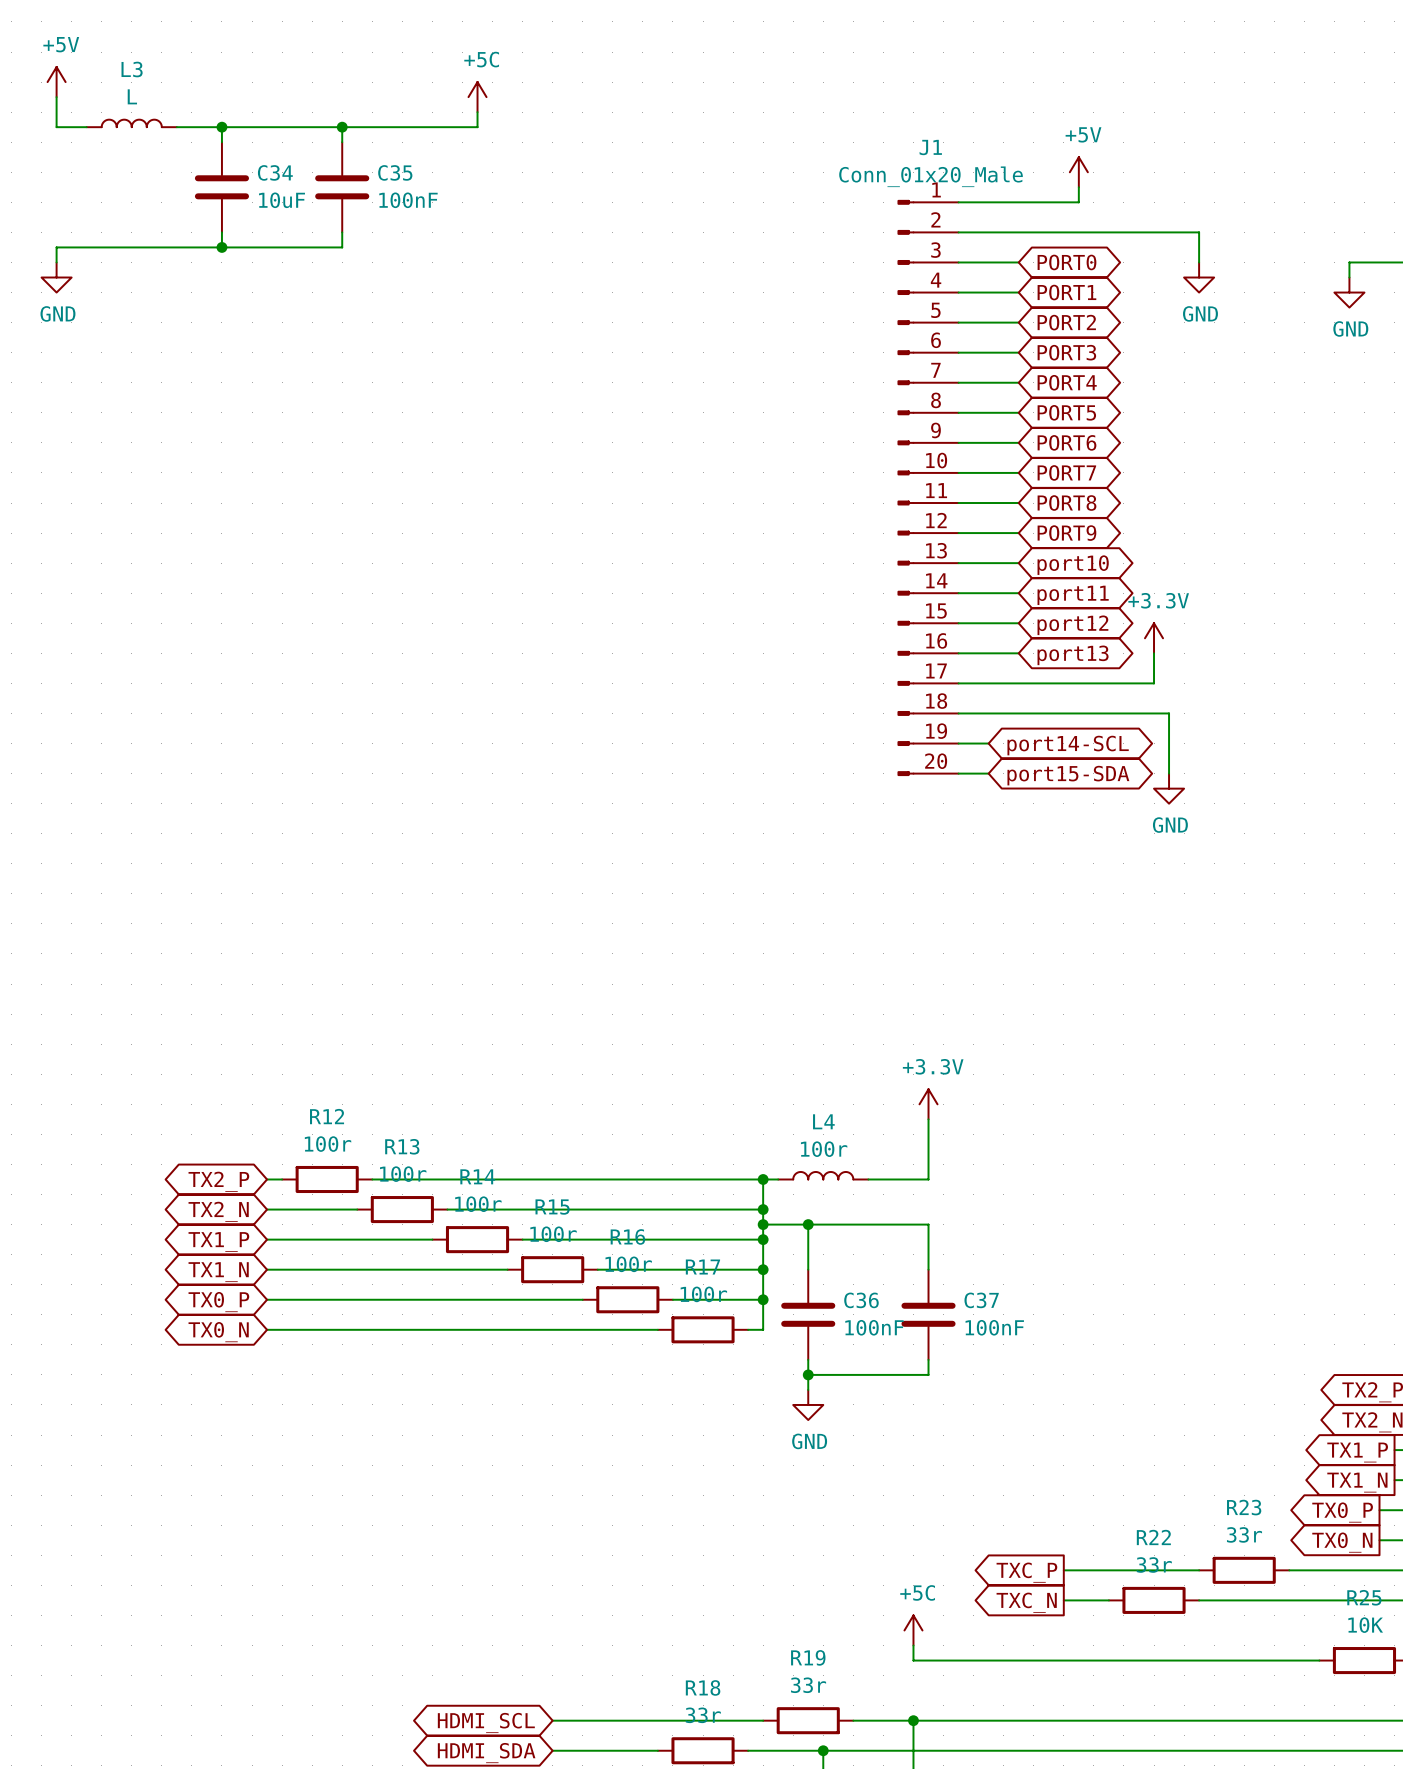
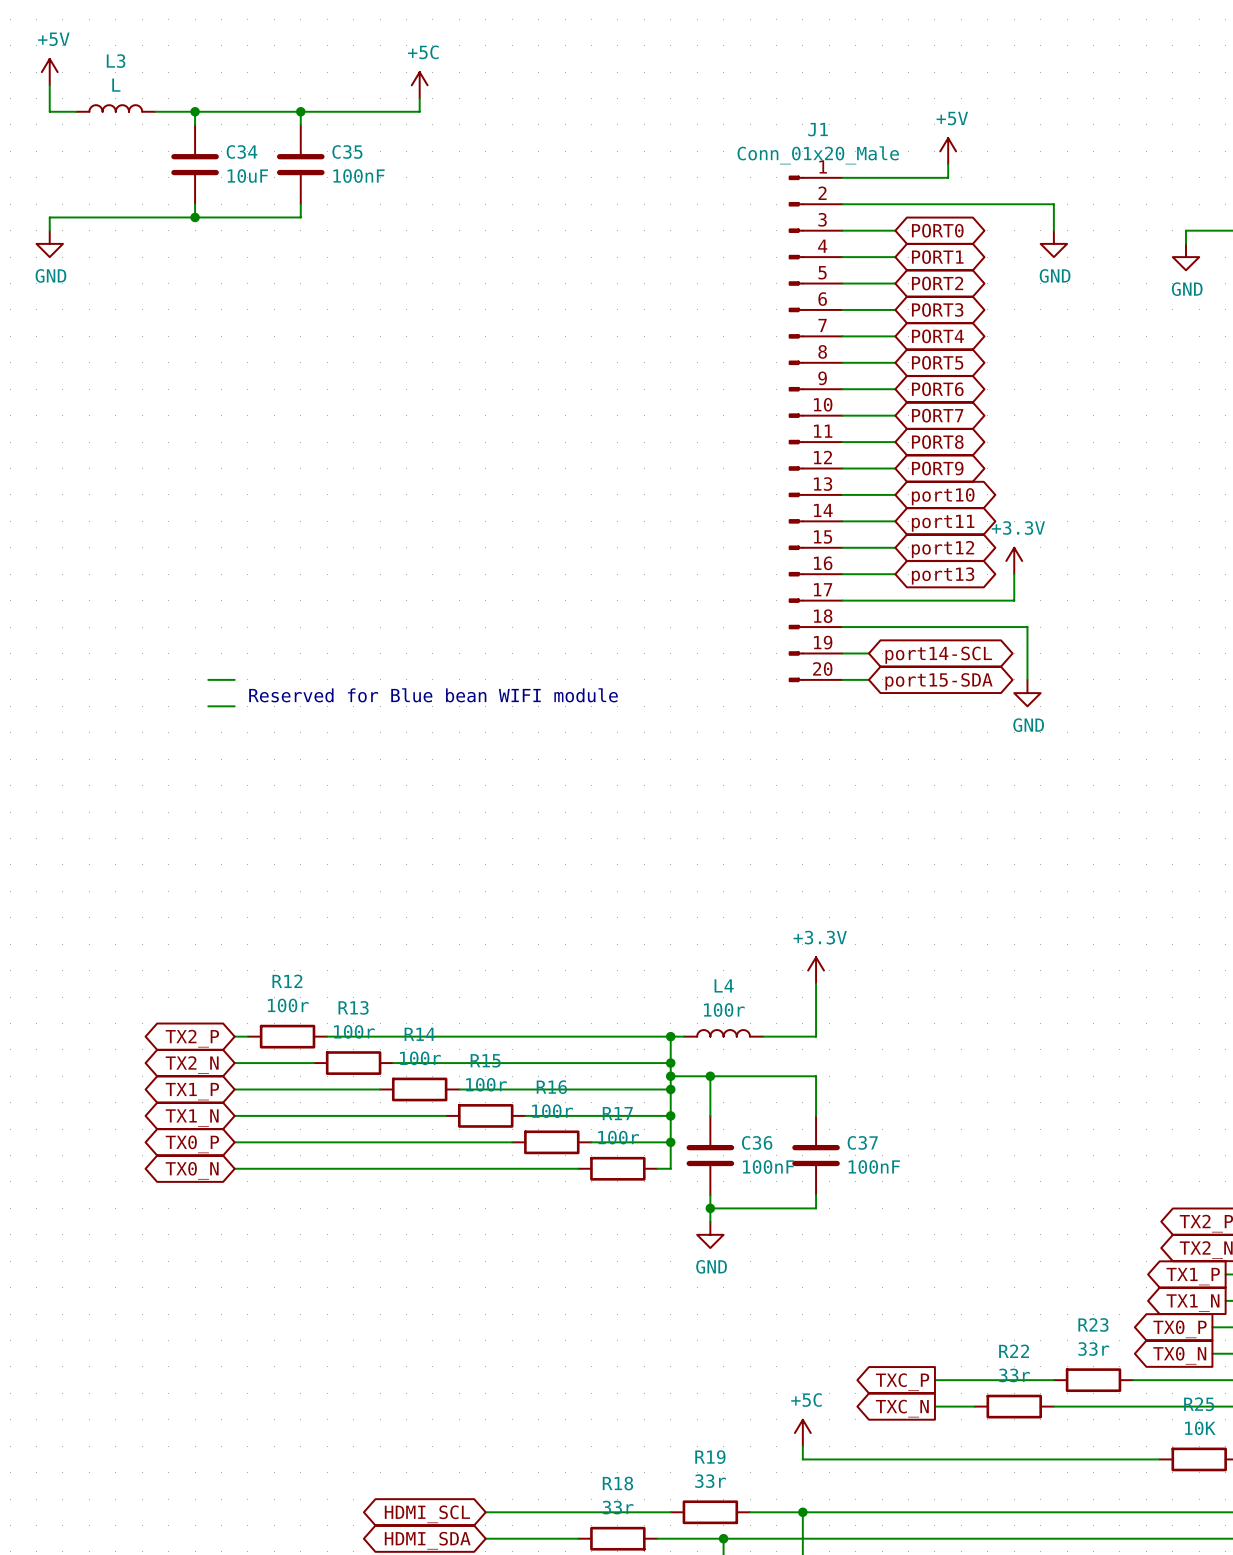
wire: none -> (208, 679) (234, 679)
text: none -> Reserved for Blue bean WIFI module (433, 695)
wire: none -> (208, 706) (234, 706)

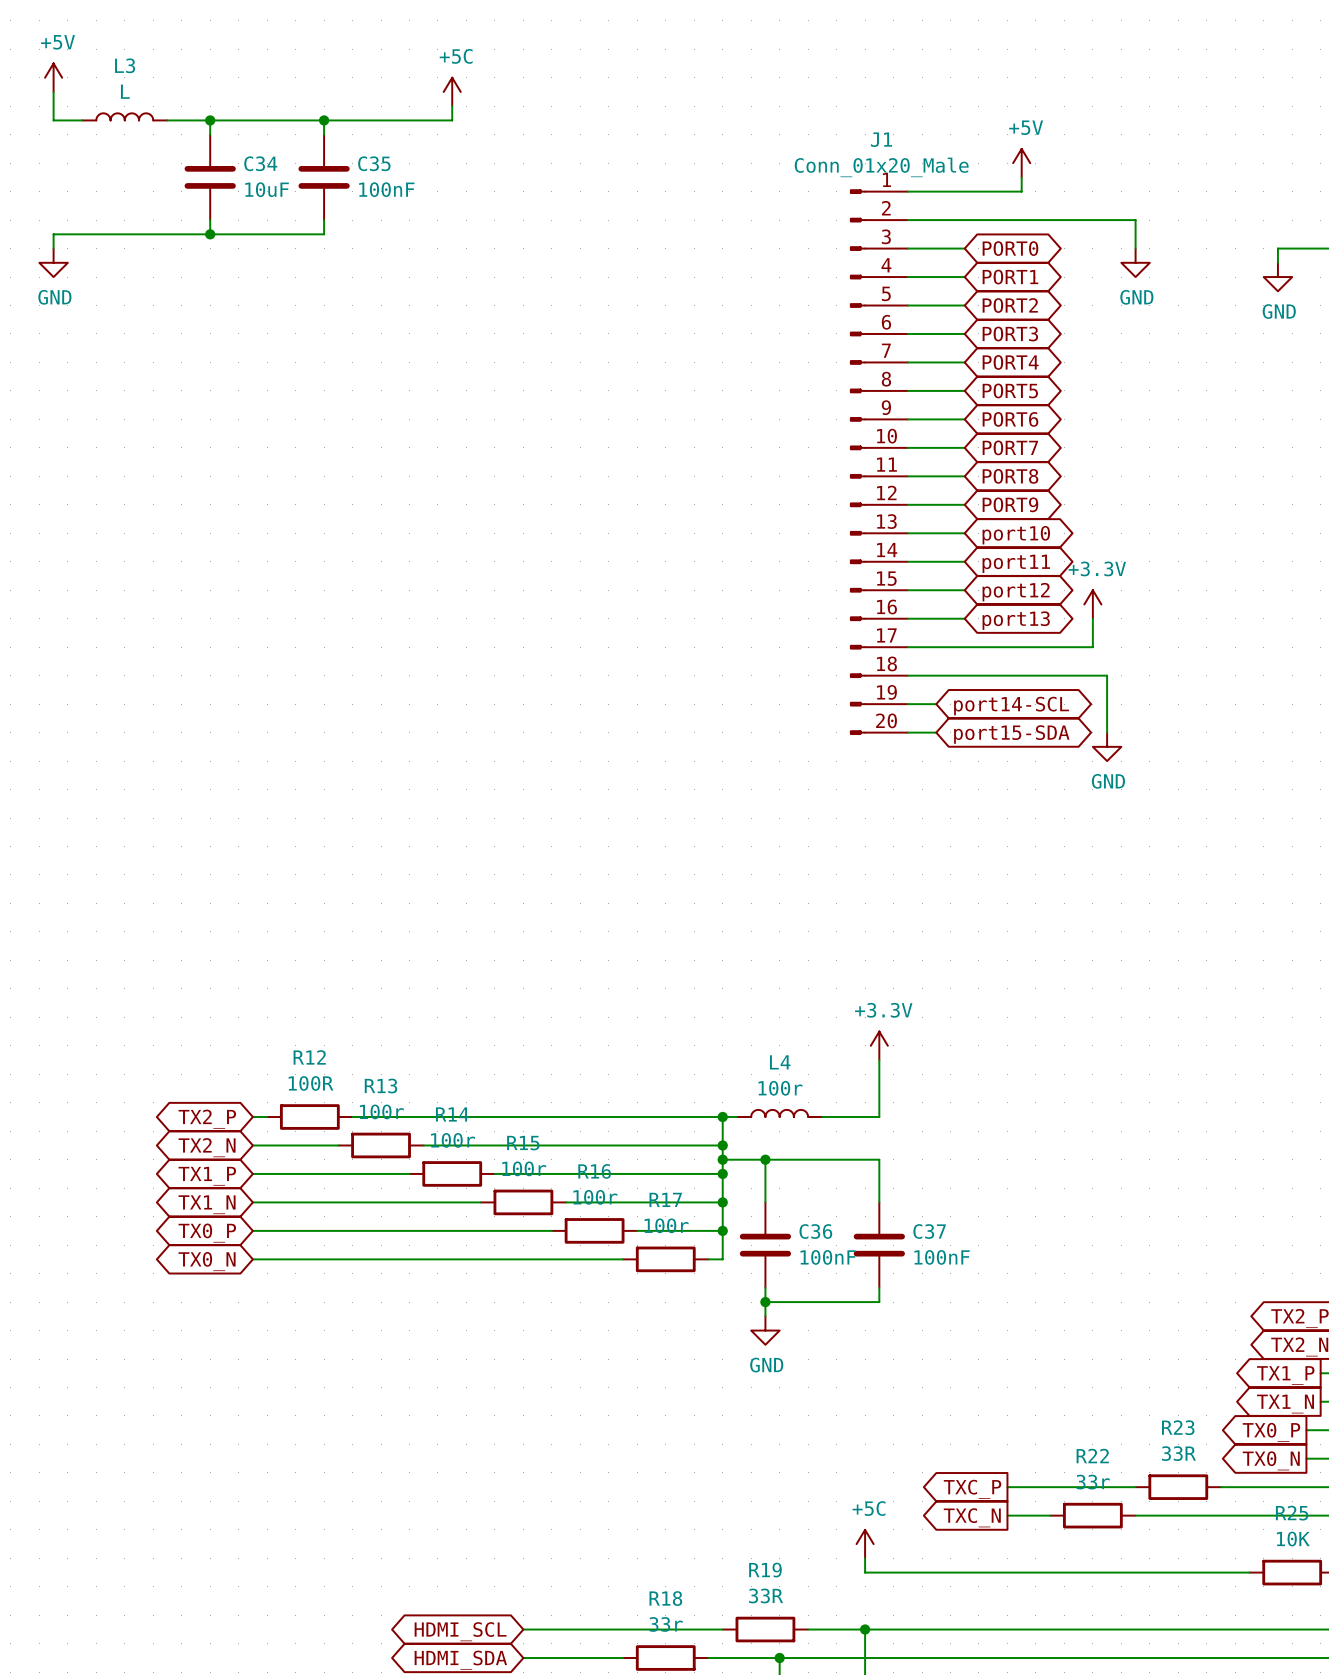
wire: (208, 679) (234, 679) -> none
text: Reserved for Blue bean WIFI module (433, 695) -> none
wire: (208, 706) (234, 706) -> none
R12 value: 100r (288, 1005) -> 100R (311, 1083)
R23 value: 33r (1093, 1349) -> 33R (1178, 1453)
R19 value: 33r (710, 1481) -> 33R (766, 1595)

